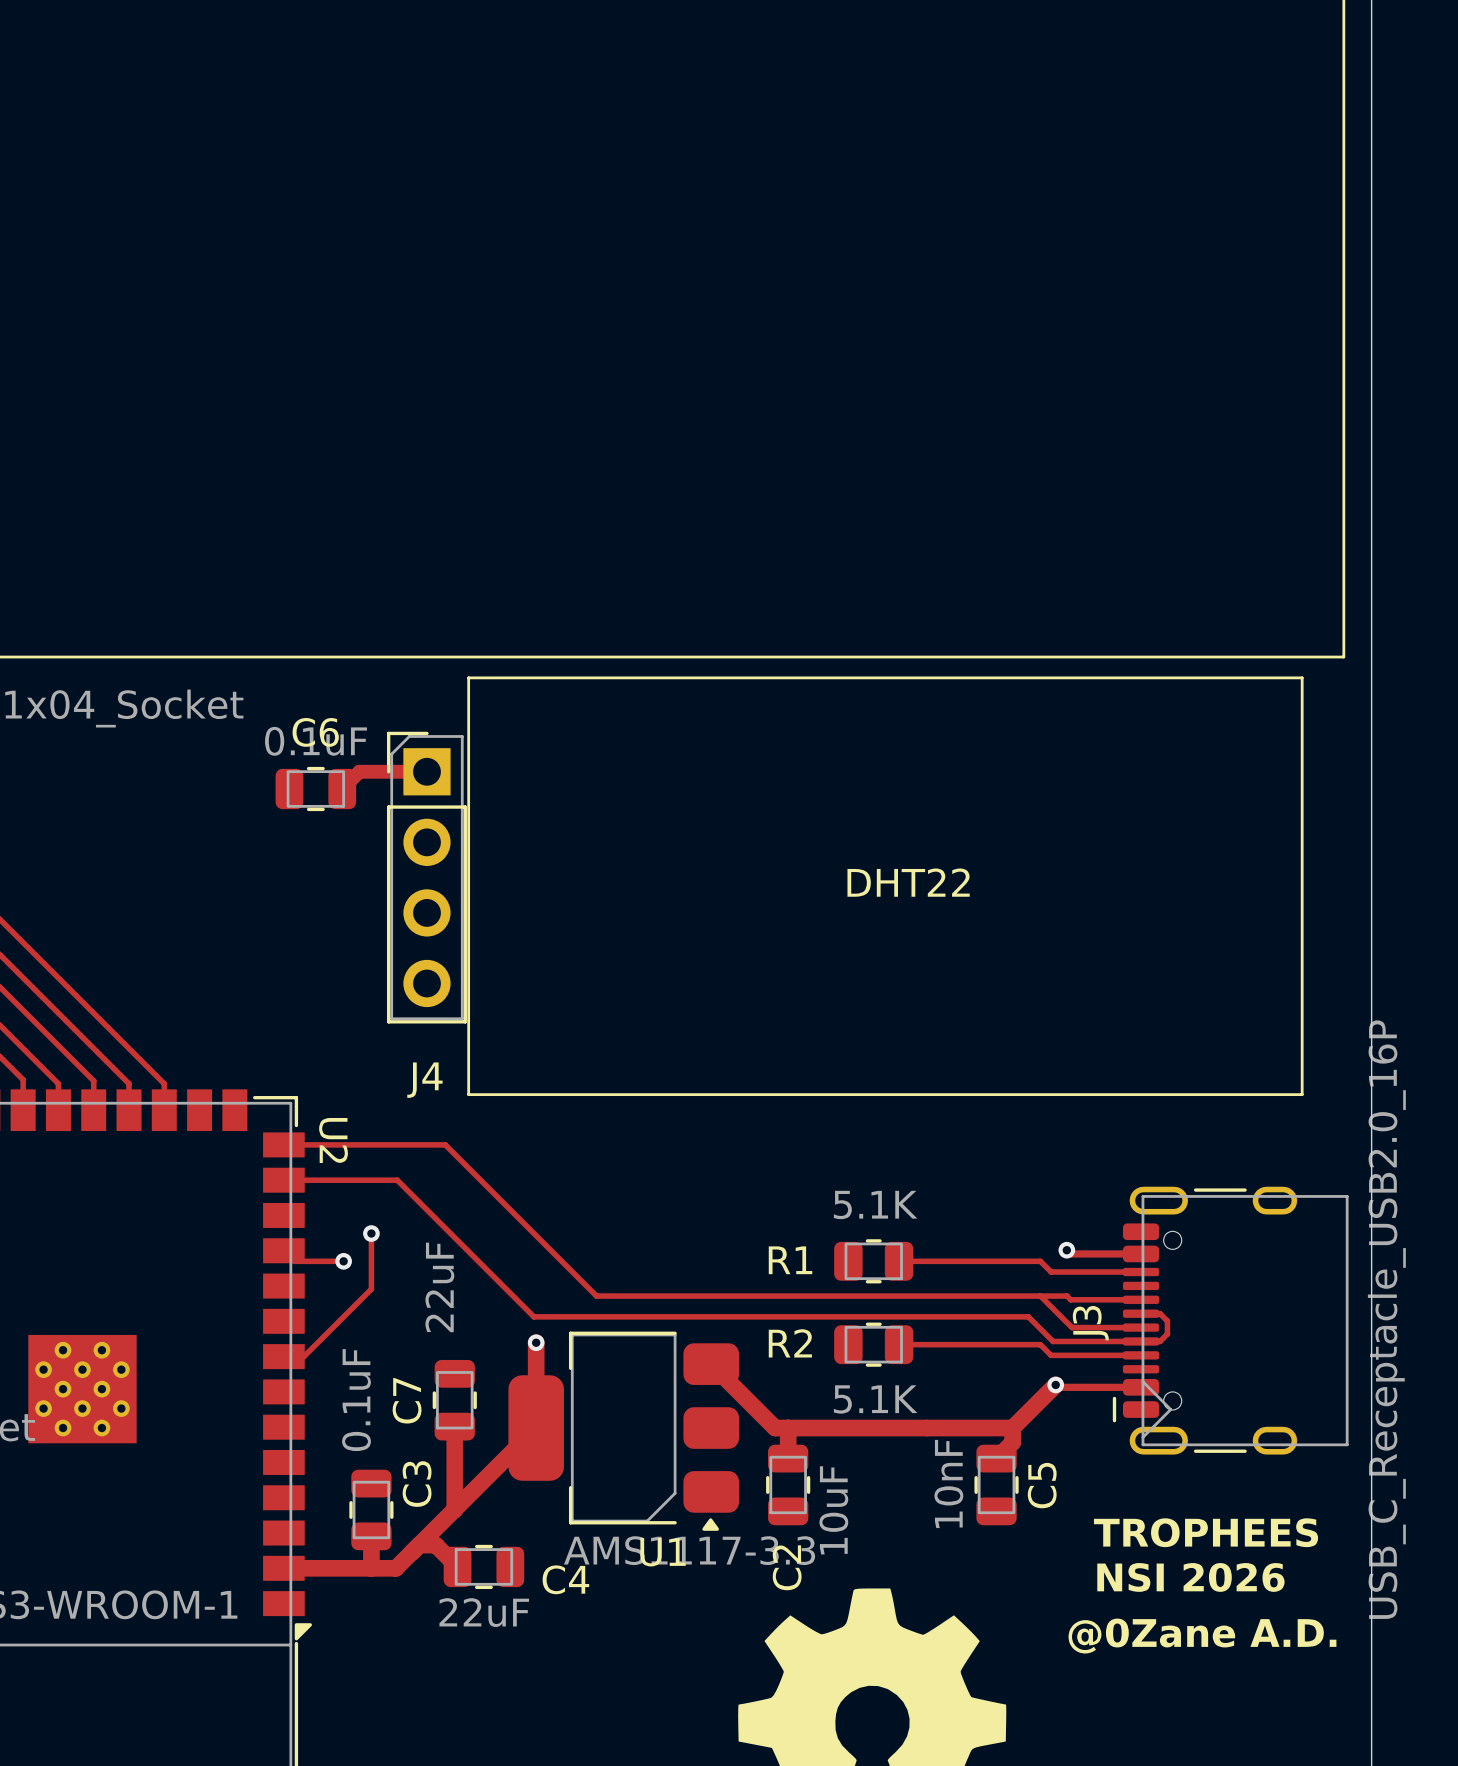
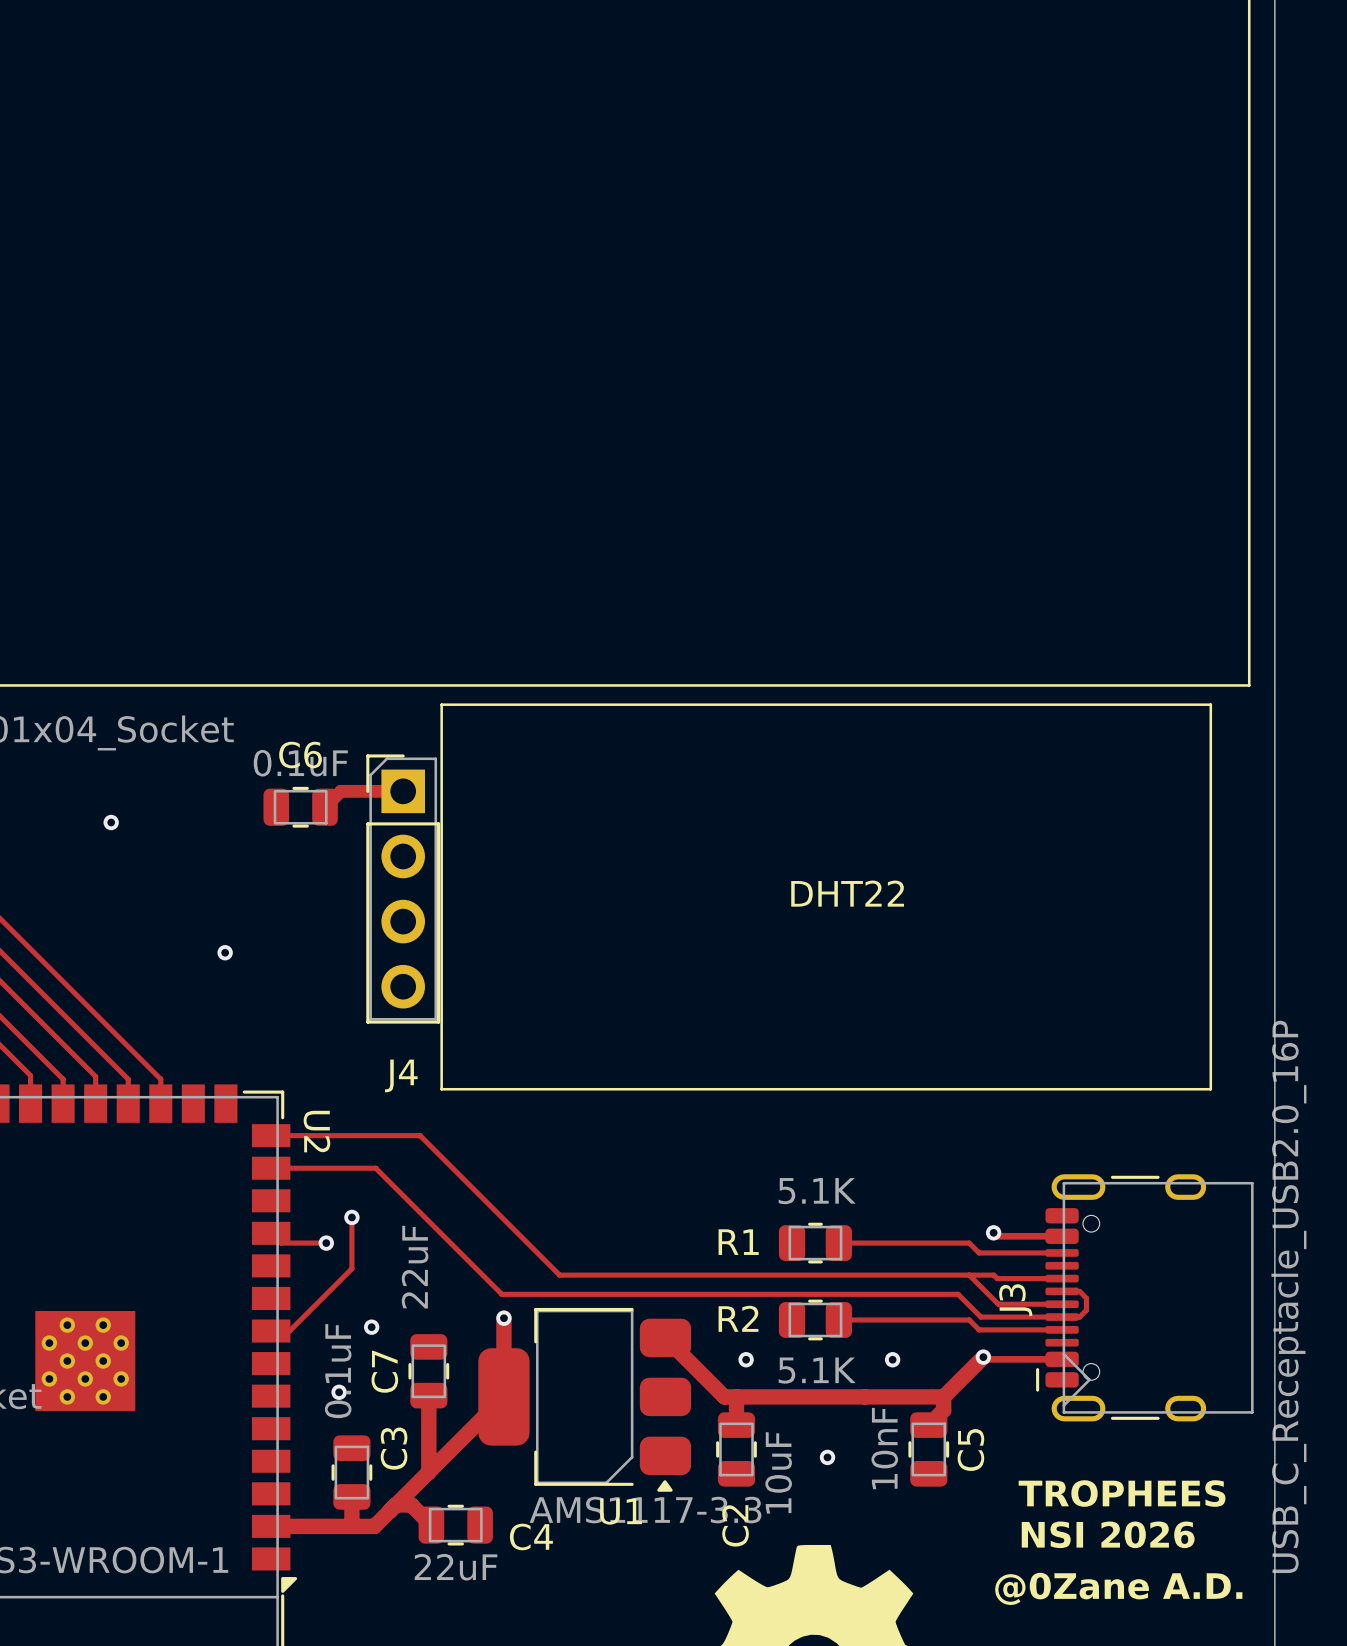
via: none -> (111, 822)
via: none -> (225, 952)
via: none -> (371, 1327)
via: none -> (746, 1359)
via: none -> (892, 1359)
via: none -> (339, 1392)
via: none -> (827, 1457)

